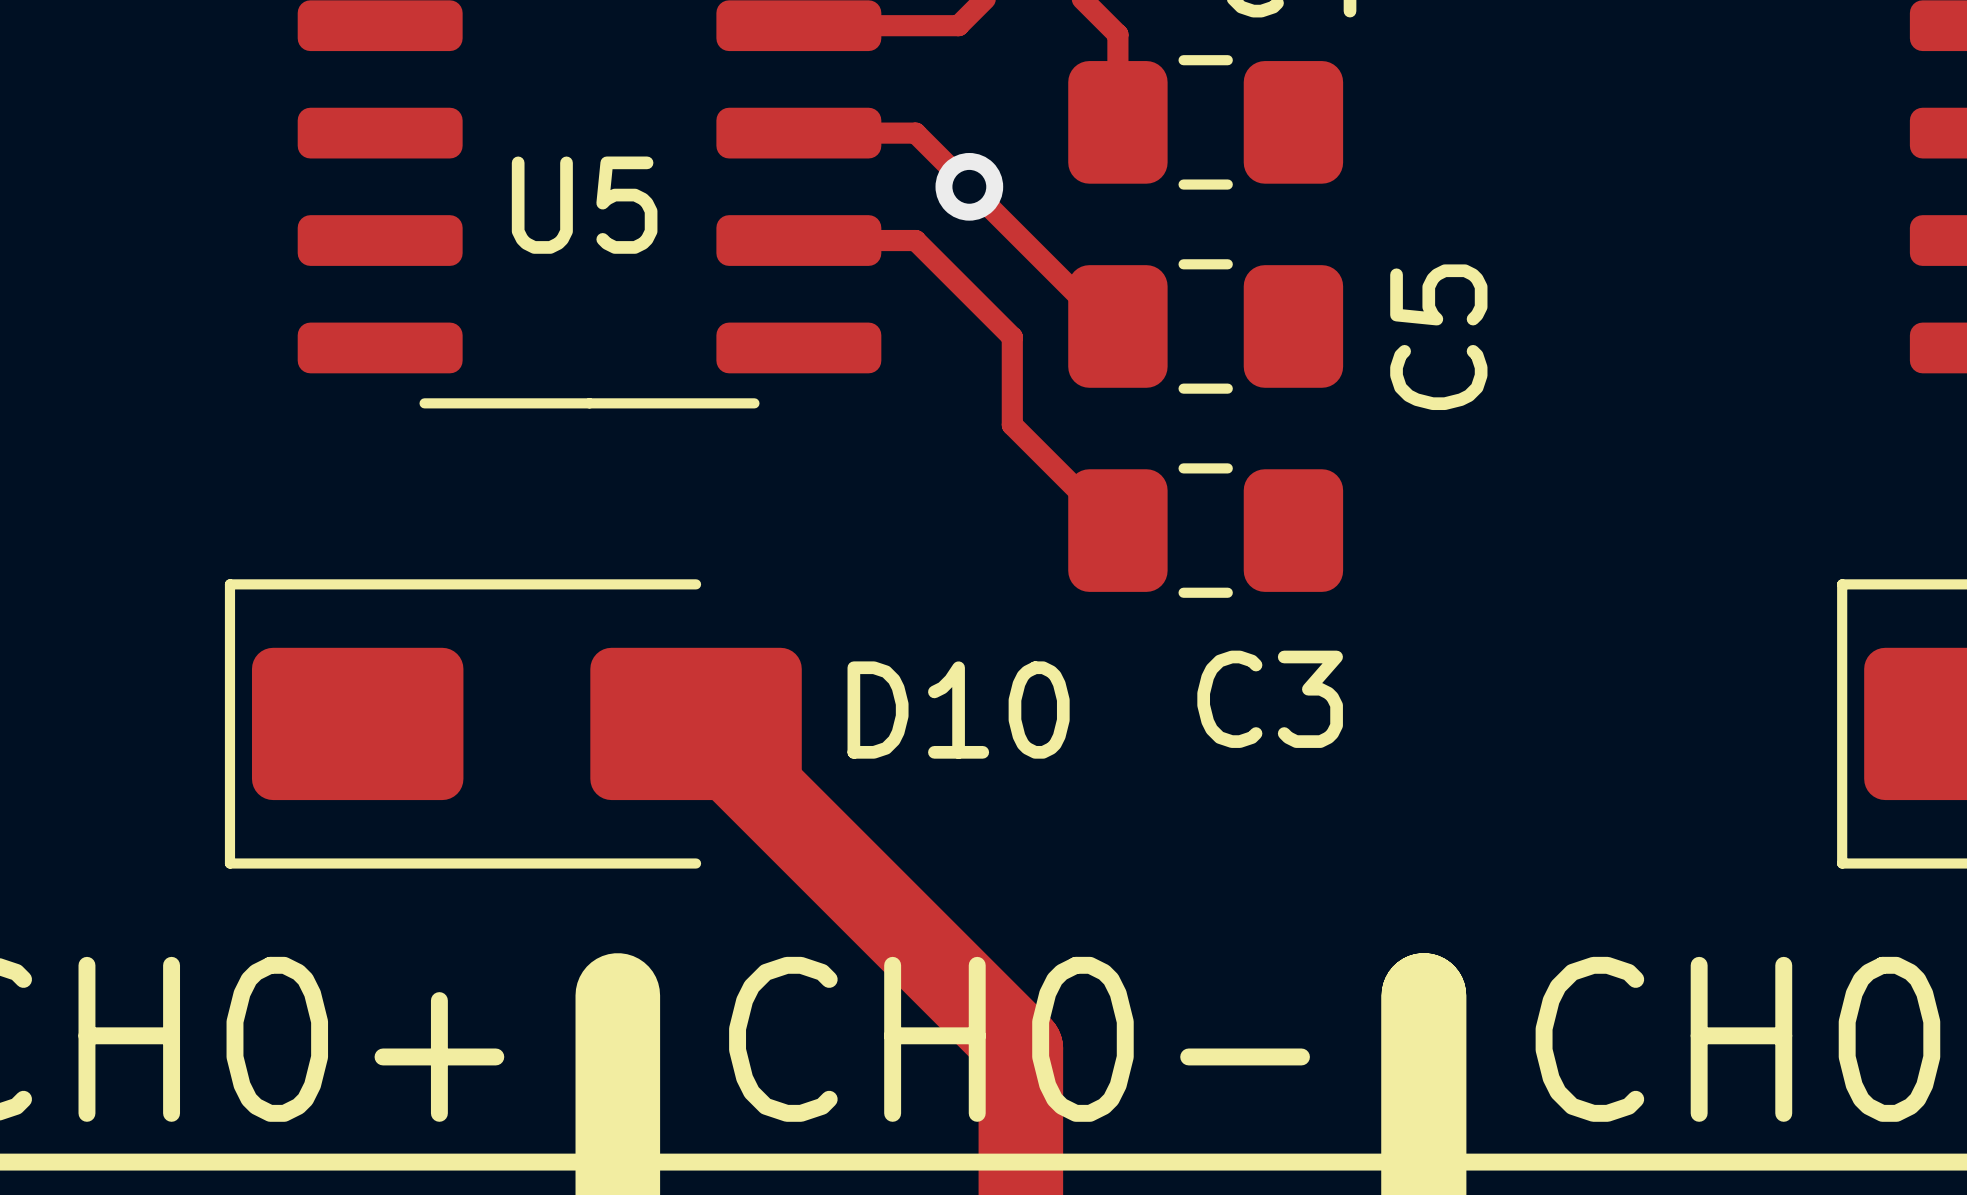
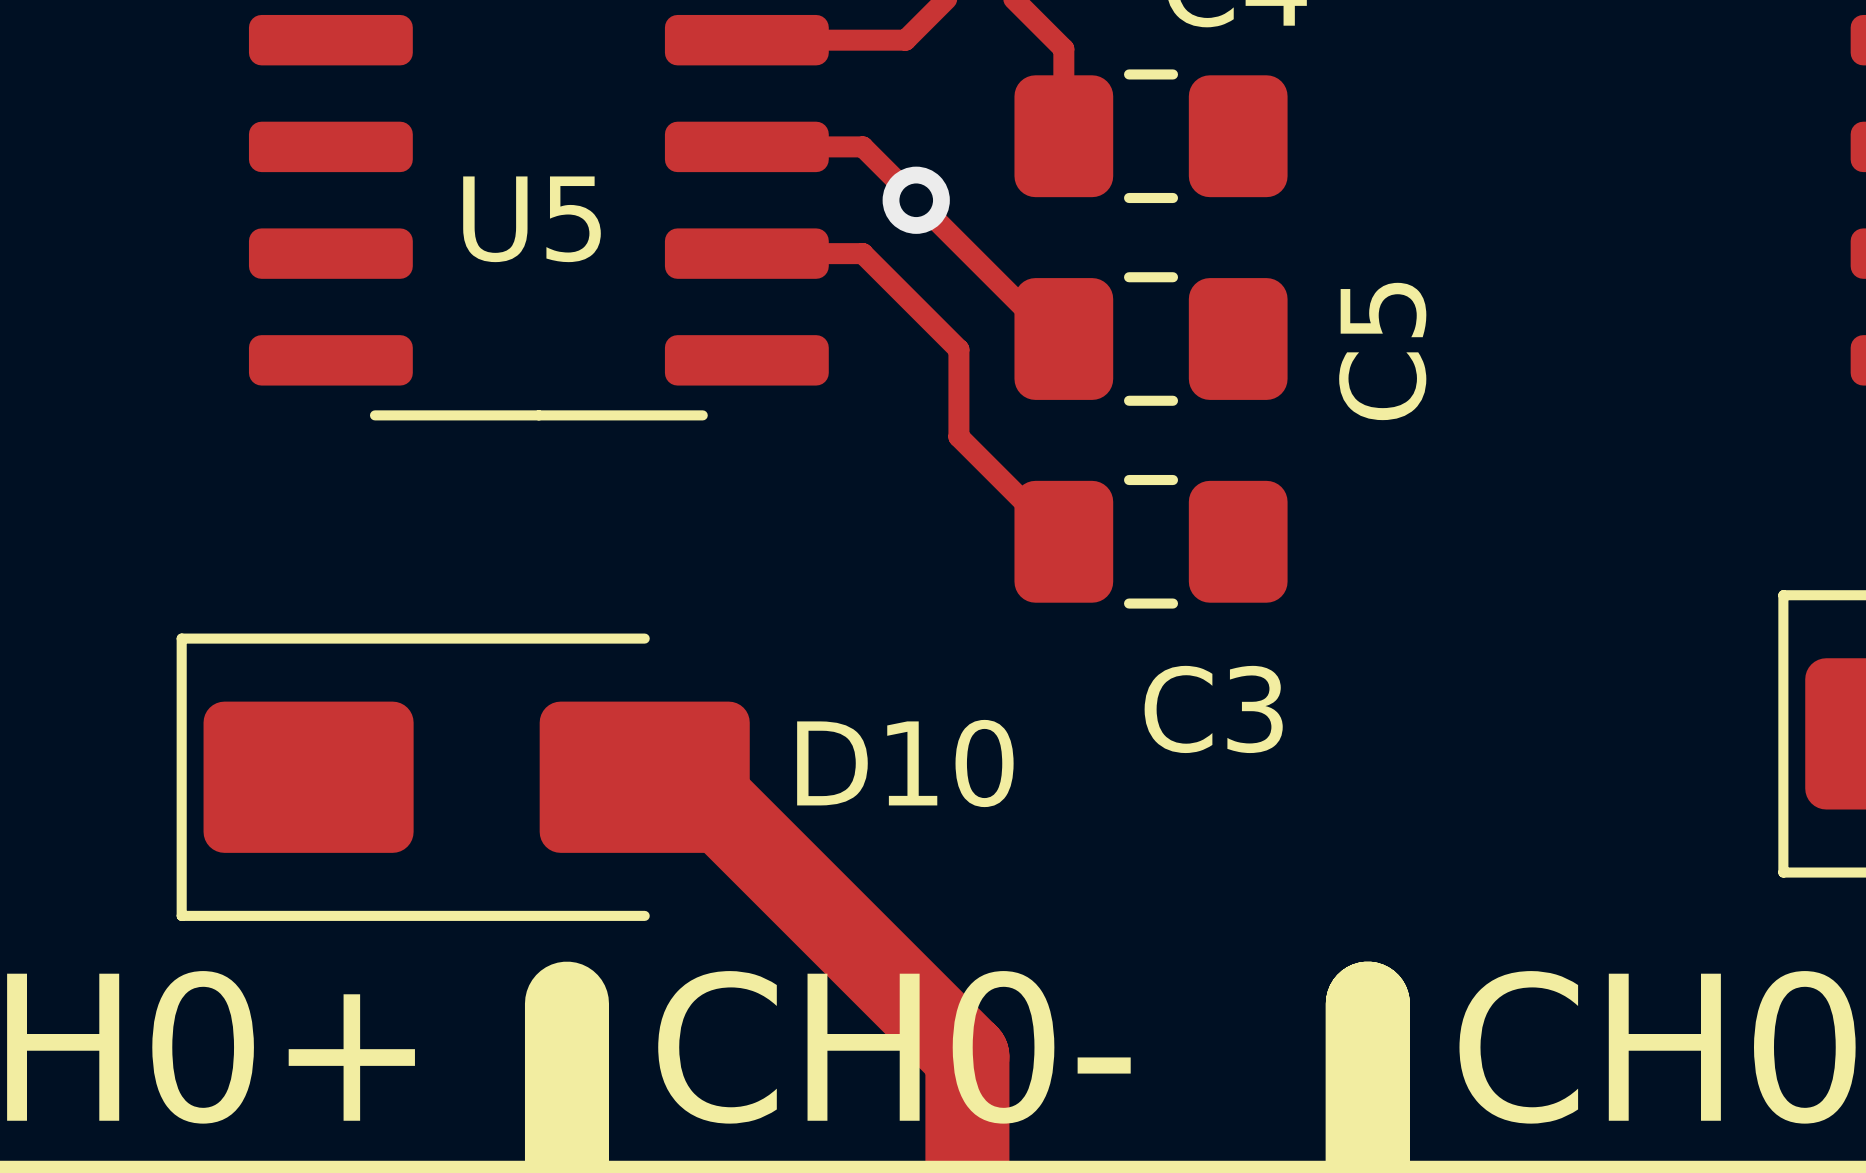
D10 position: (513, 723) -> (463, 777)

